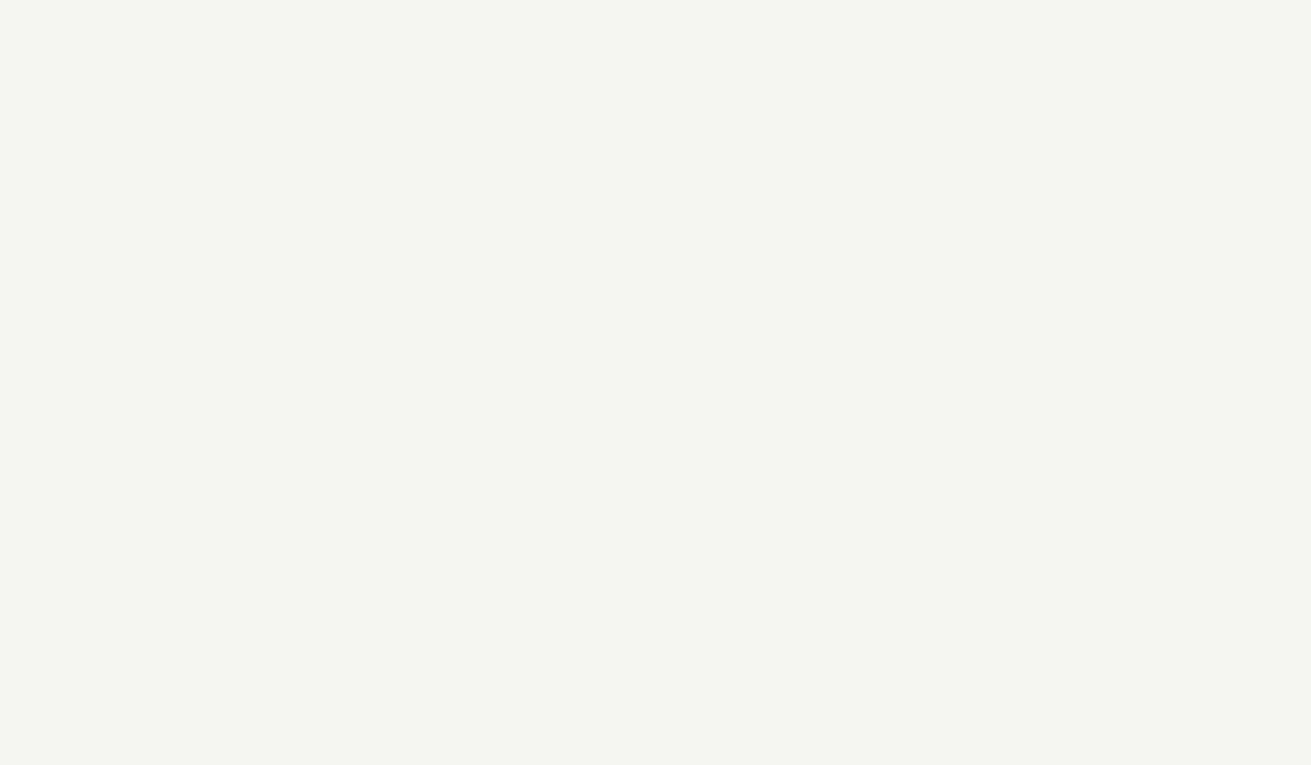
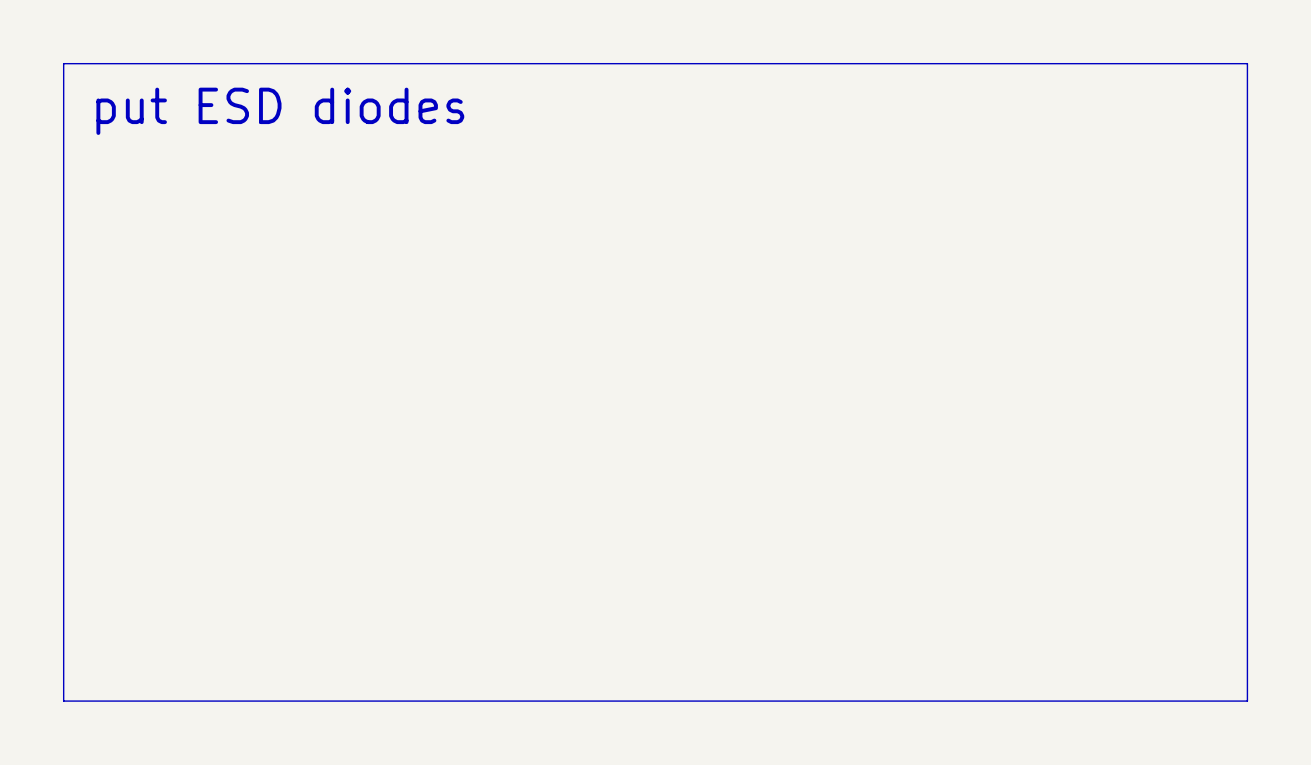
line: none -> (63, 63) (1247, 63) (1247, 701) (63, 701) (63, 63)
text: none -> put ESD diodes (280, 111)

